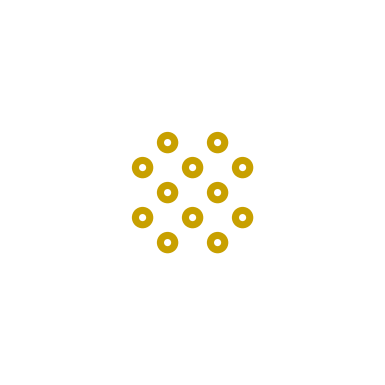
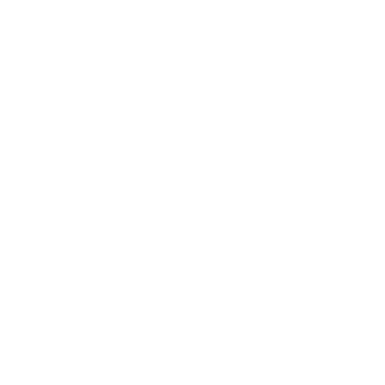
part: (192, 192) -> none

